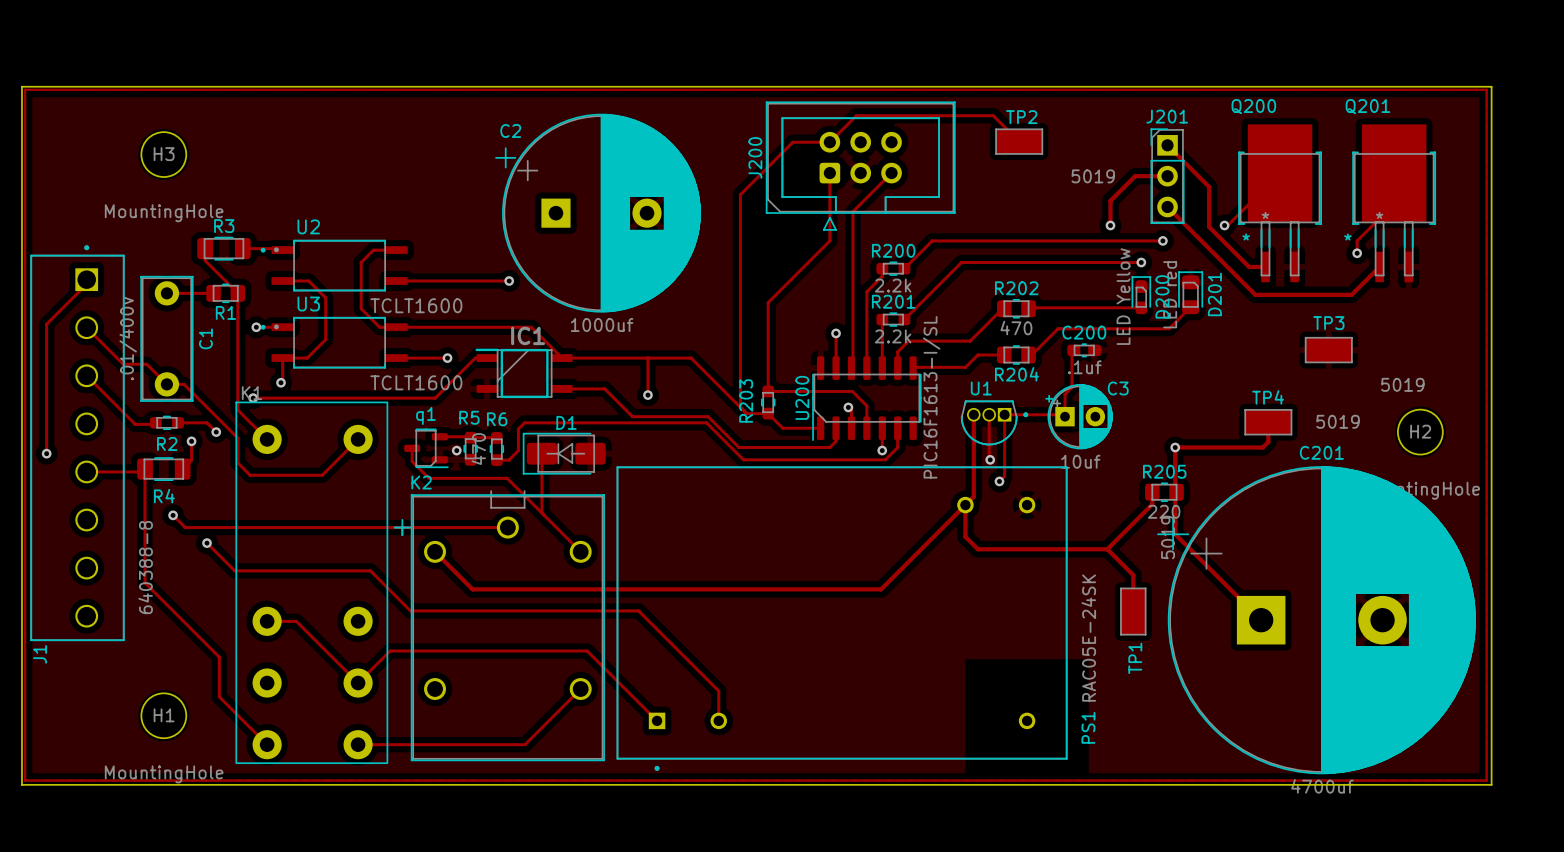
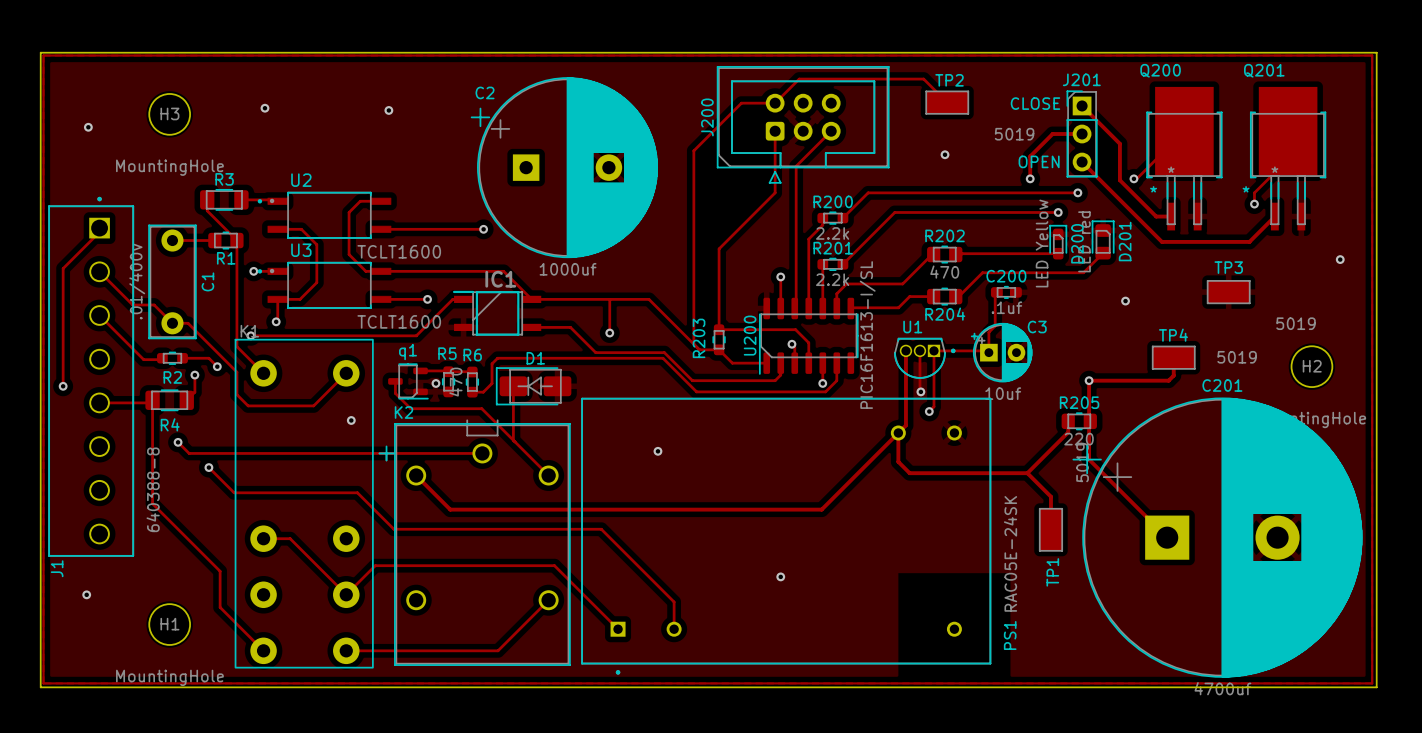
text: none -> CLOSE (1035, 103)
via: none -> (264, 108)
via: none -> (388, 110)
via: none -> (88, 127)
via: none -> (945, 154)
text: none -> OPEN (1039, 161)
via: none -> (1340, 259)
via: none -> (1125, 301)
via: none -> (351, 420)
via: none -> (657, 451)
via: none -> (780, 576)
via: none -> (86, 594)

